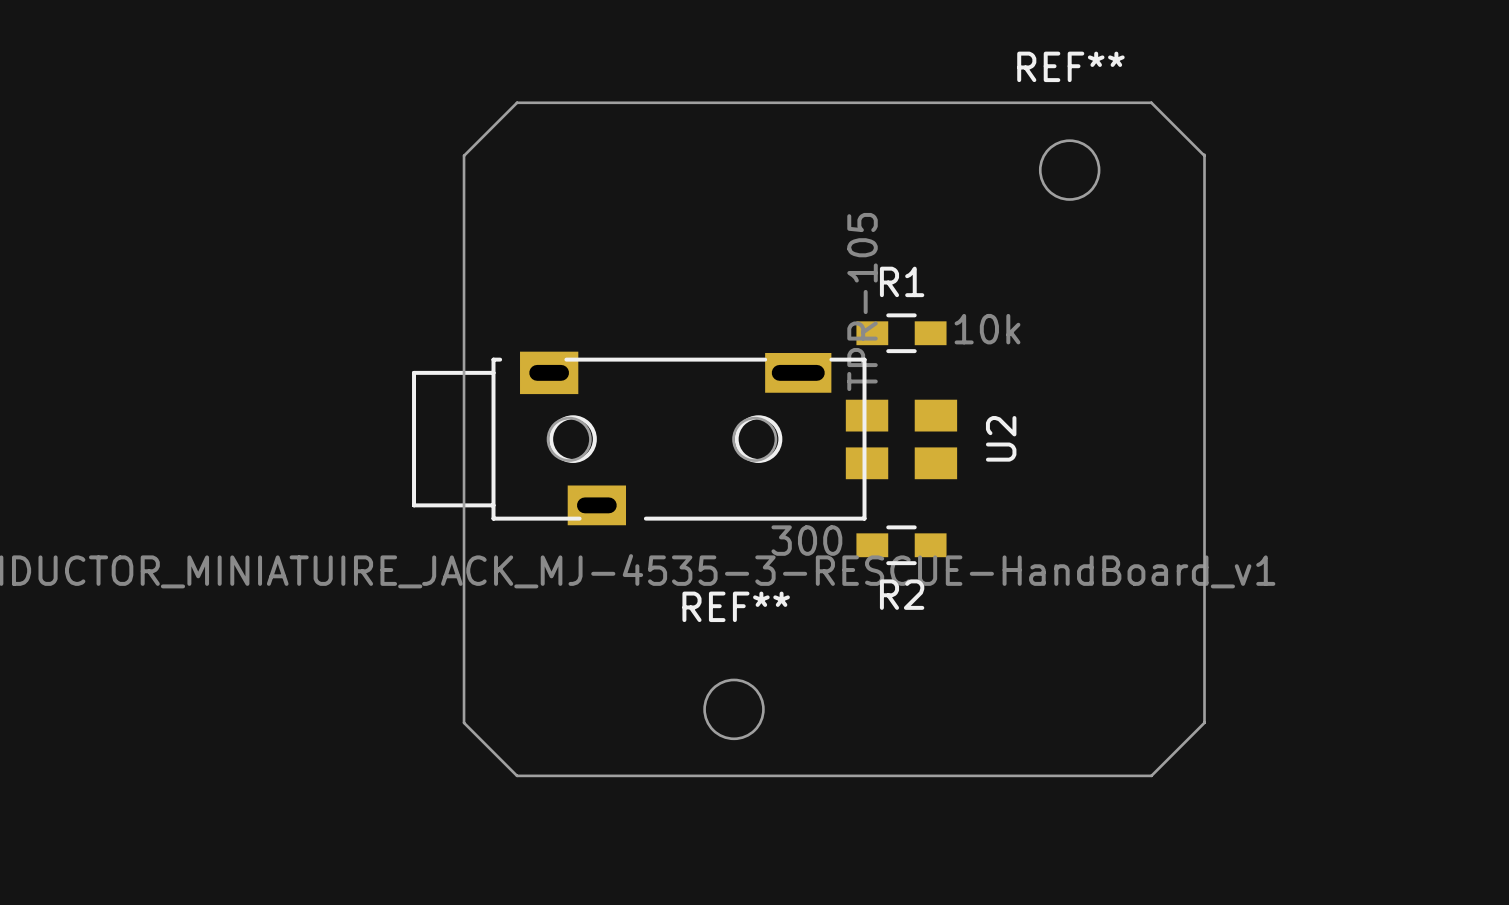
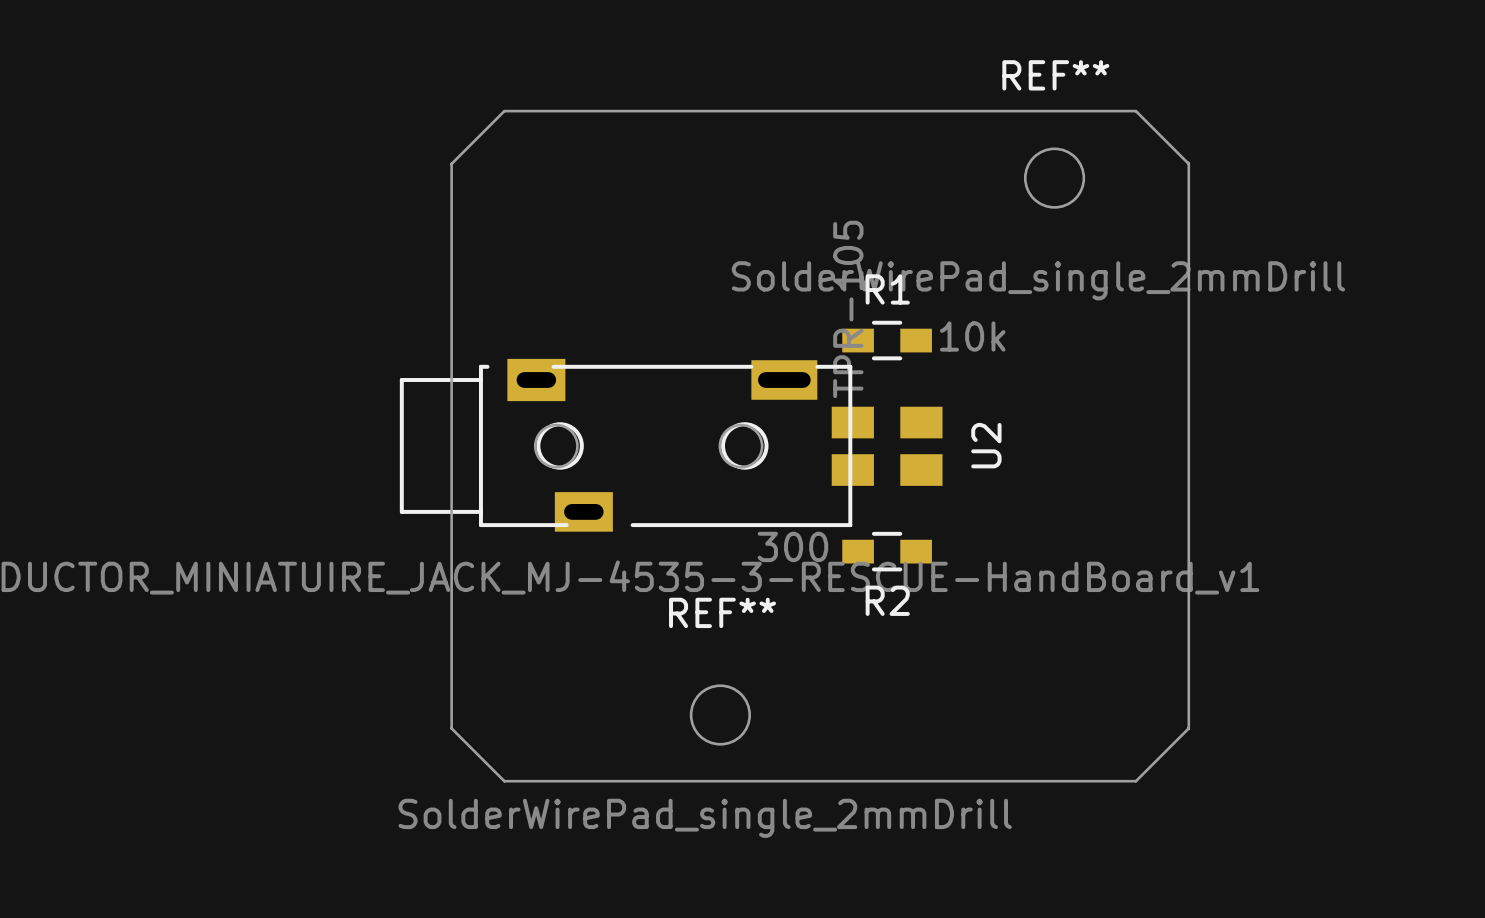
REF**: none -> SolderWirePad_single_2mmDrill (1038, 180)
REF**: none -> SolderWirePad_single_2mmDrill (705, 717)

